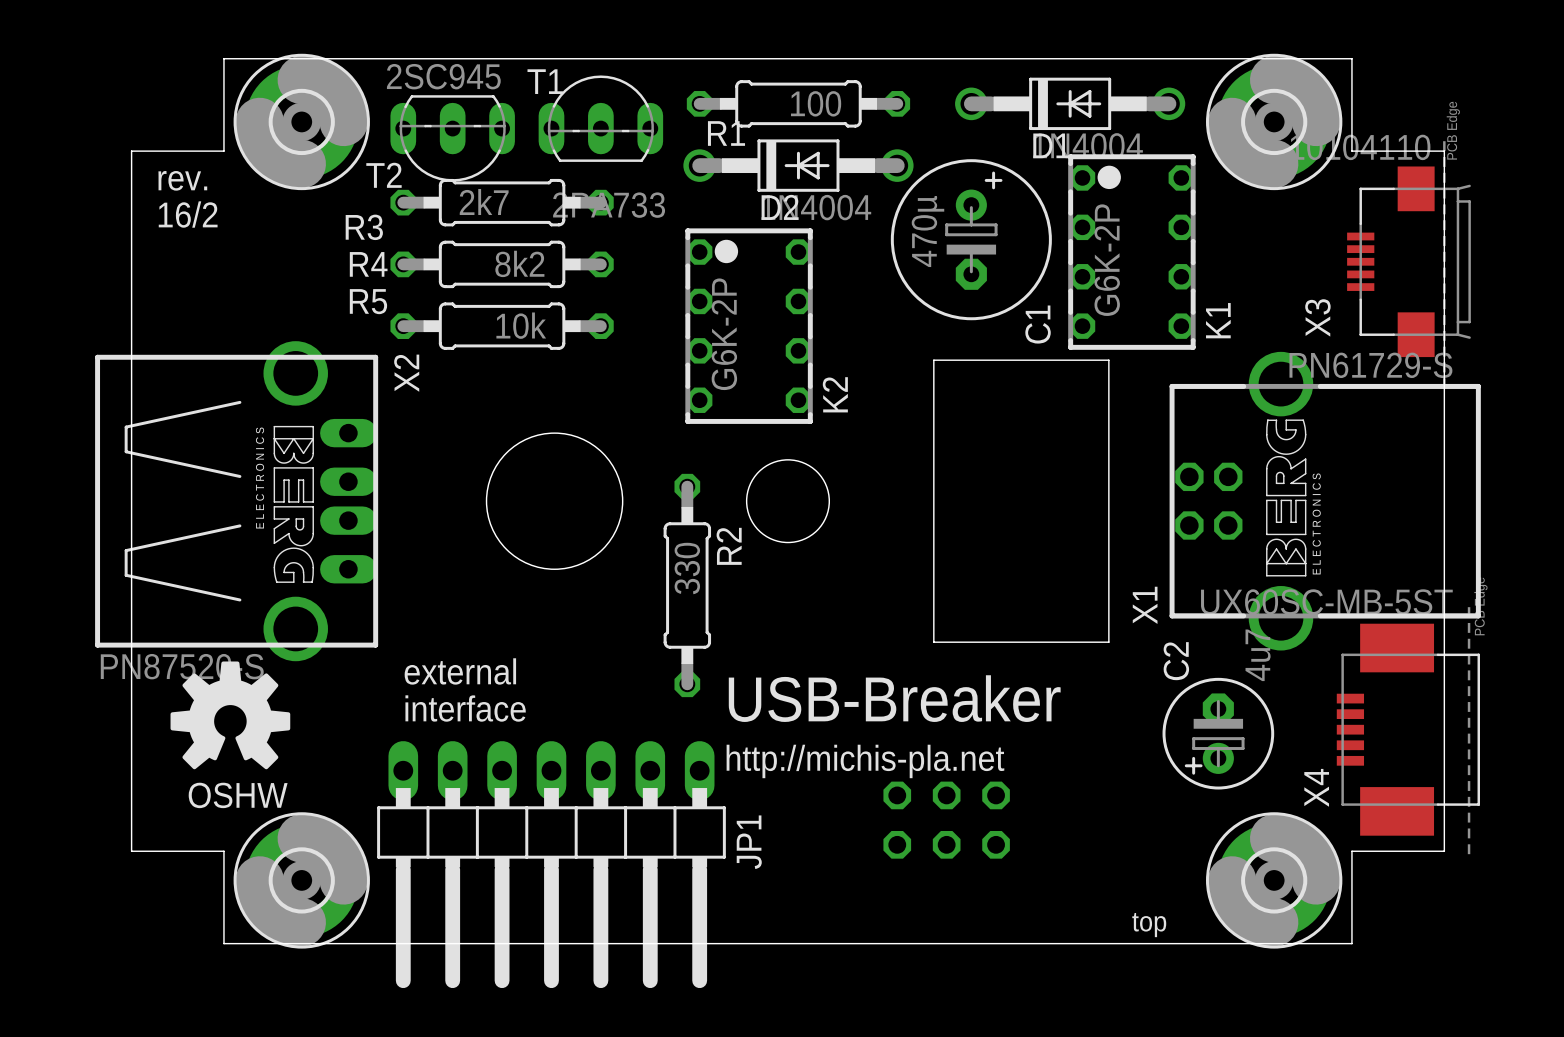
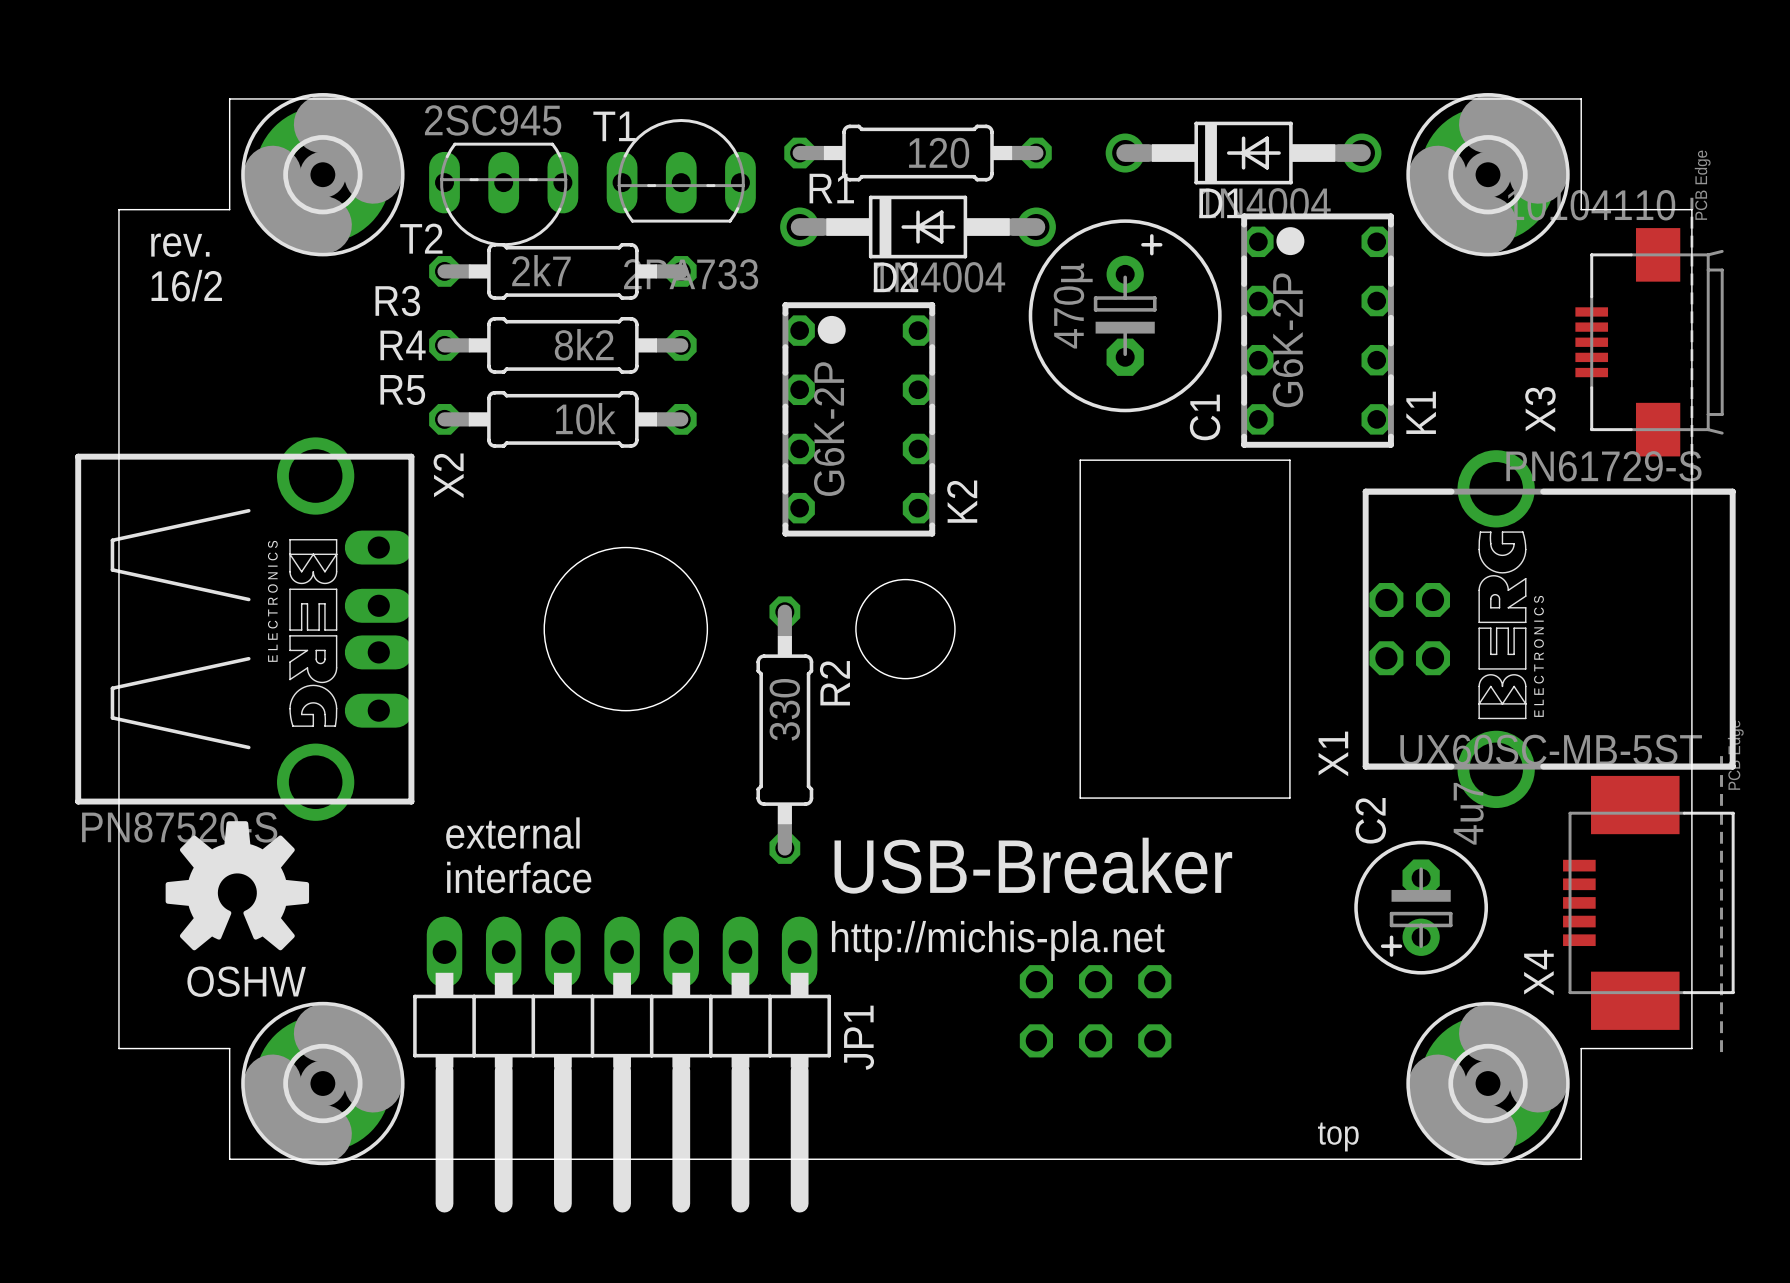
R1 value: 100 (816, 103) -> 120 (939, 153)

